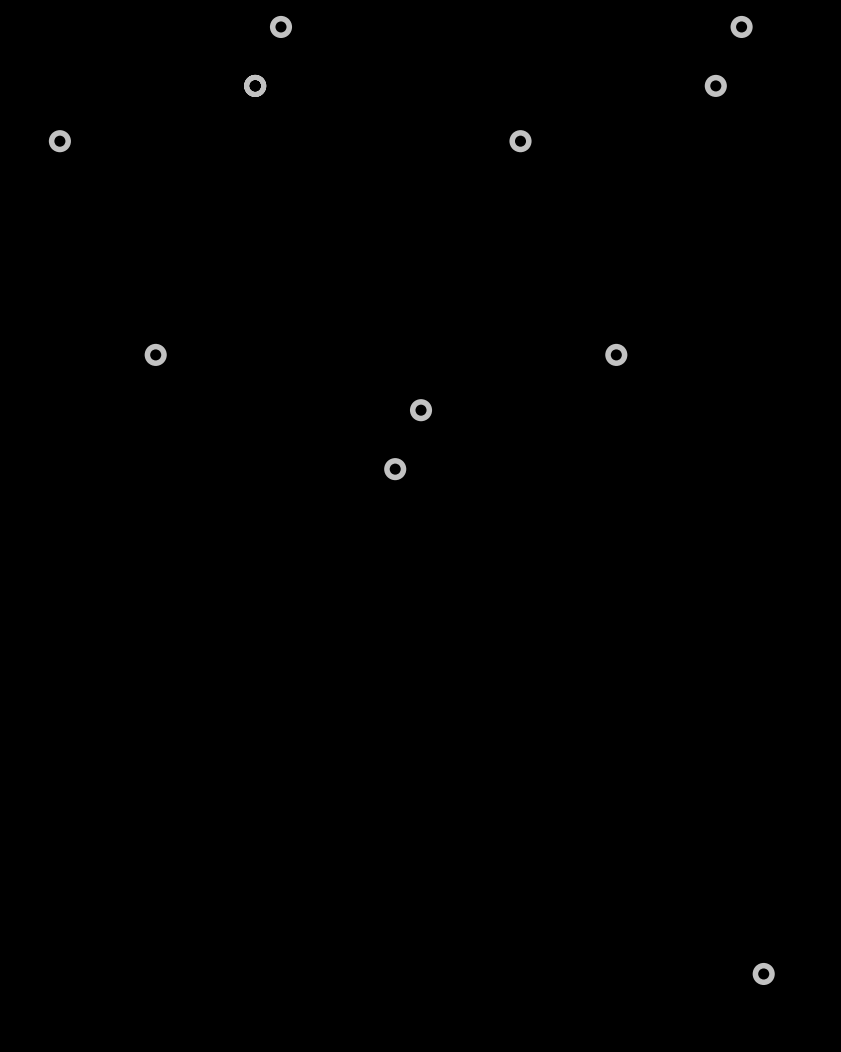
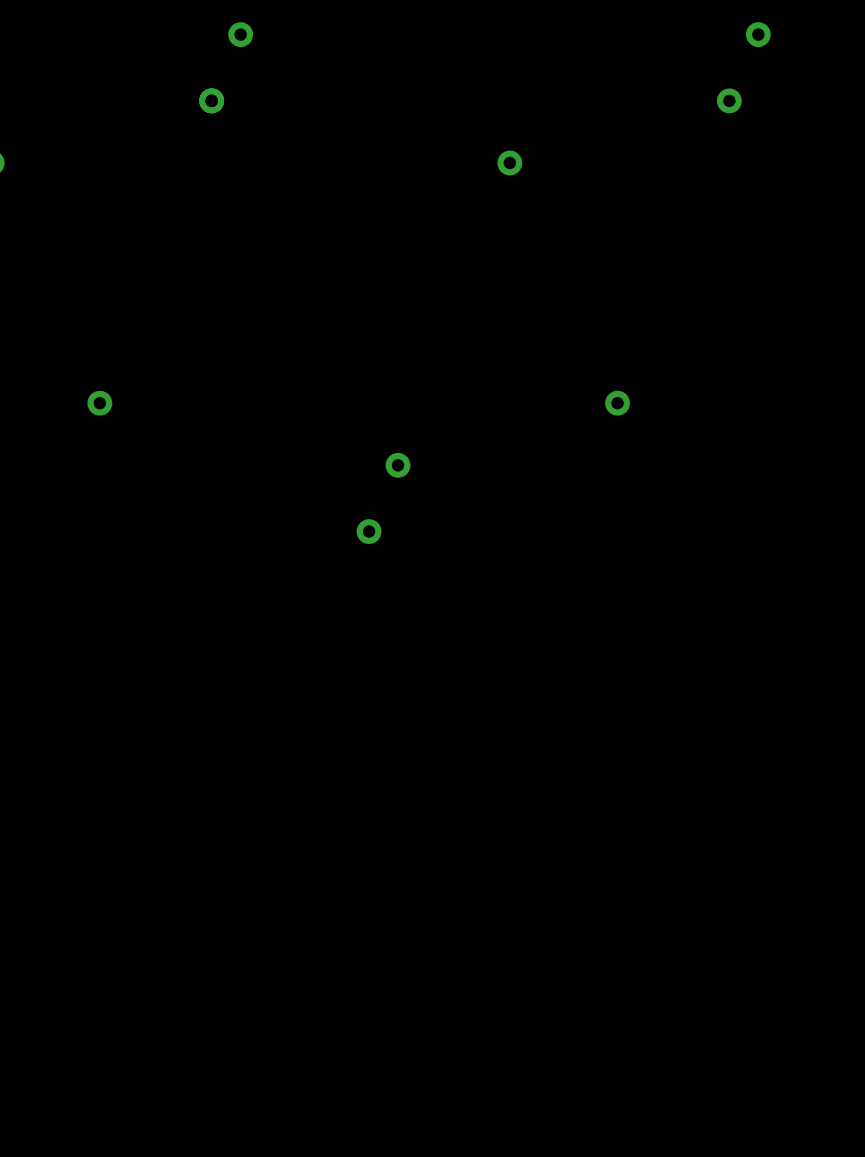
via: (763, 973) -> none

